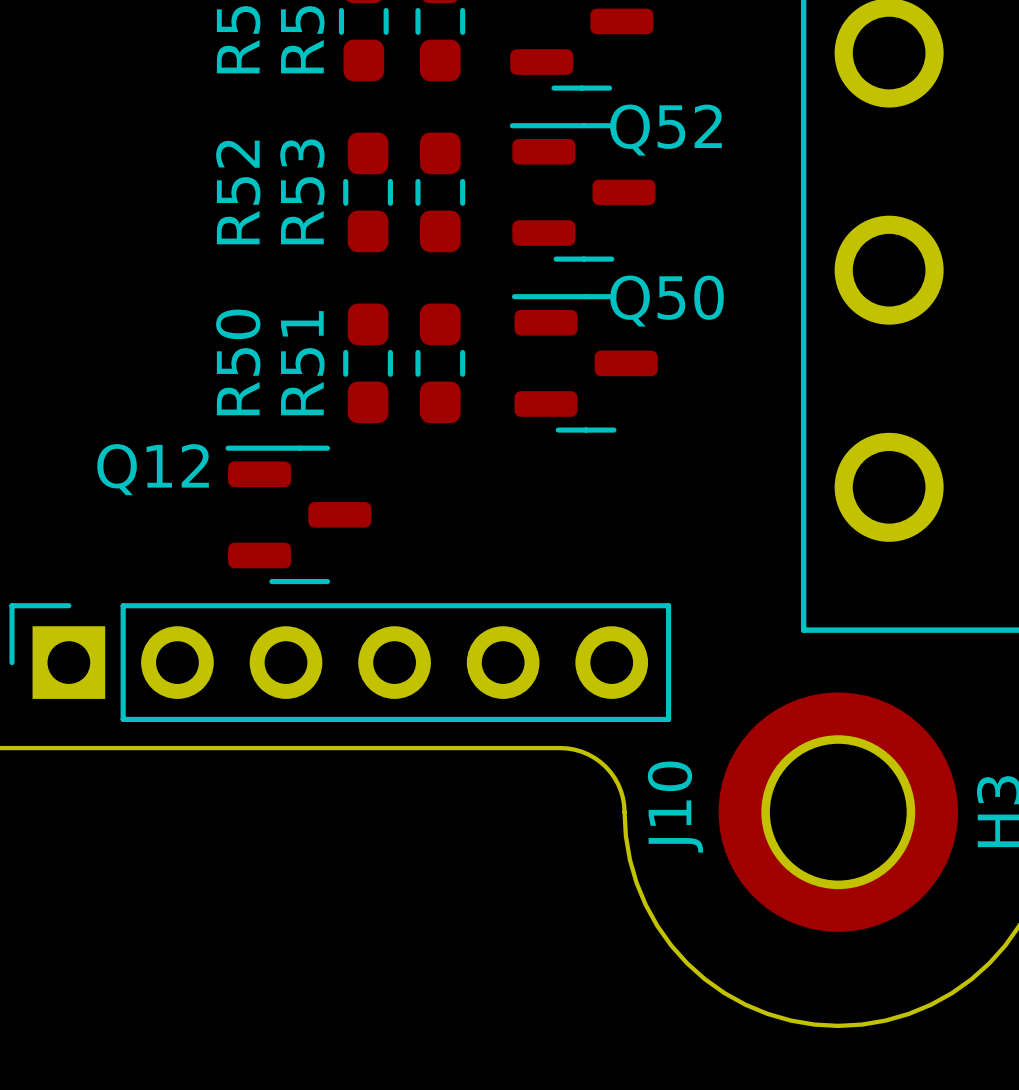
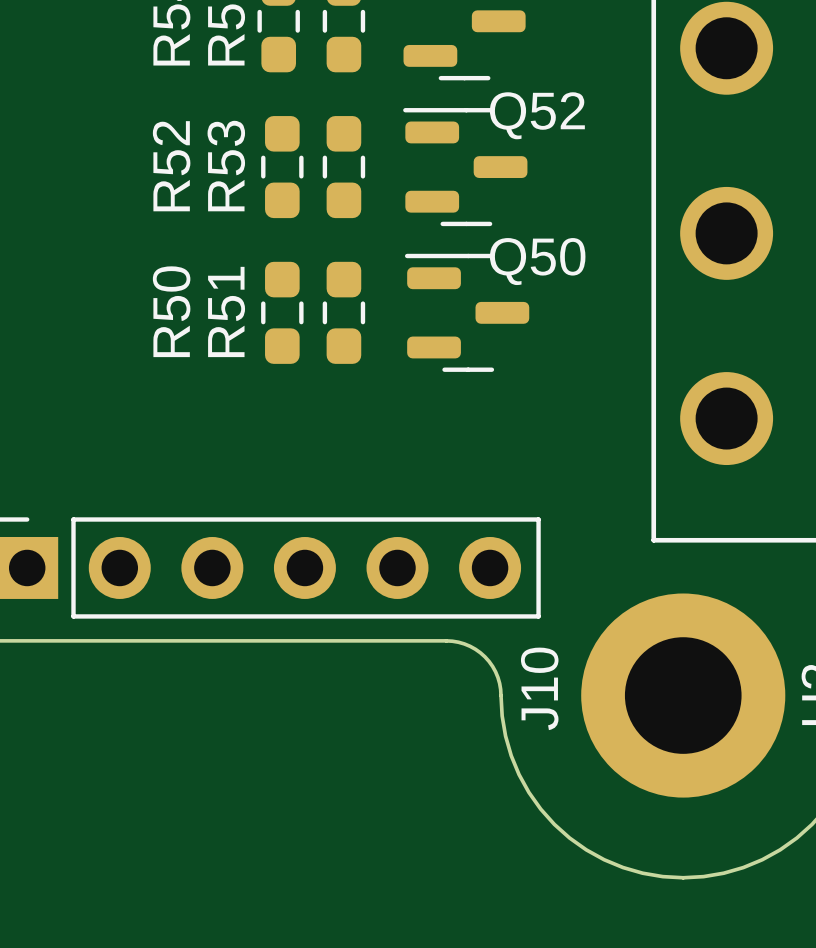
Q12: (298, 514) -> none

